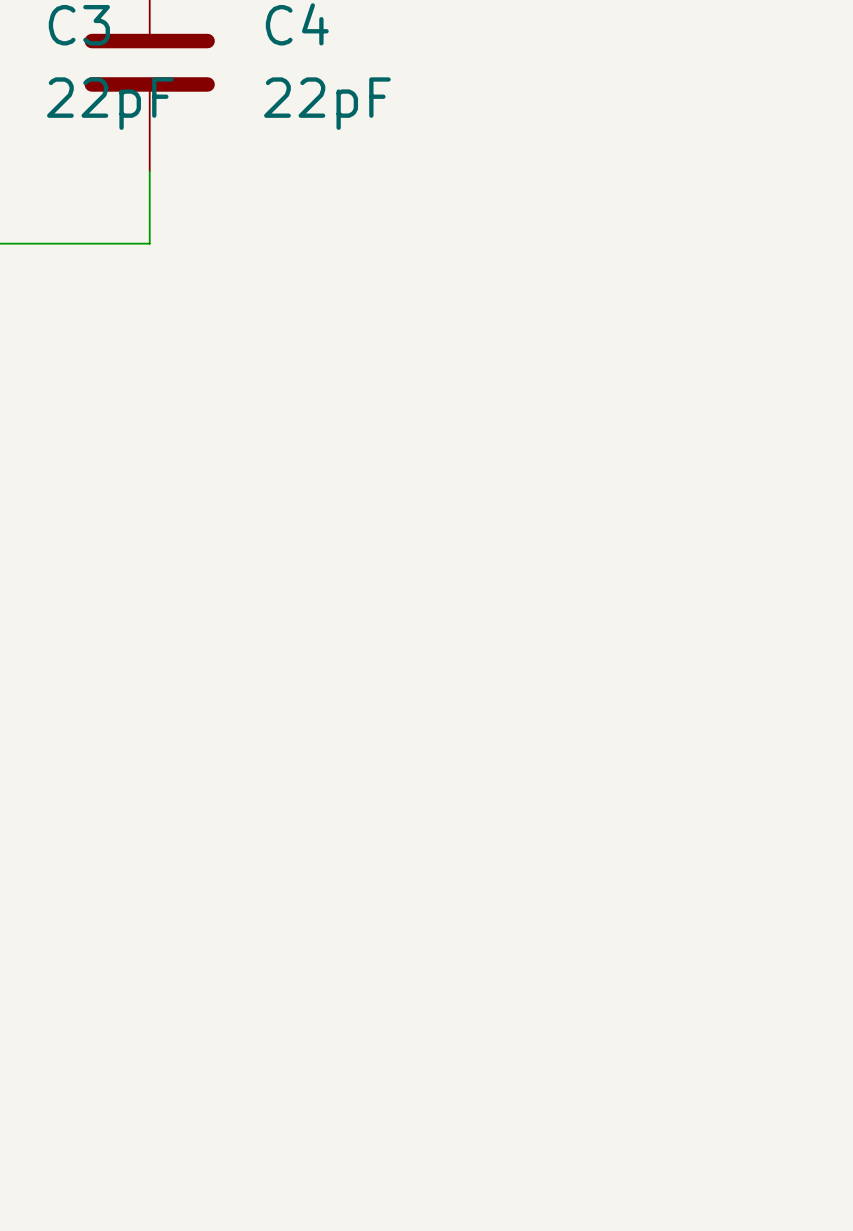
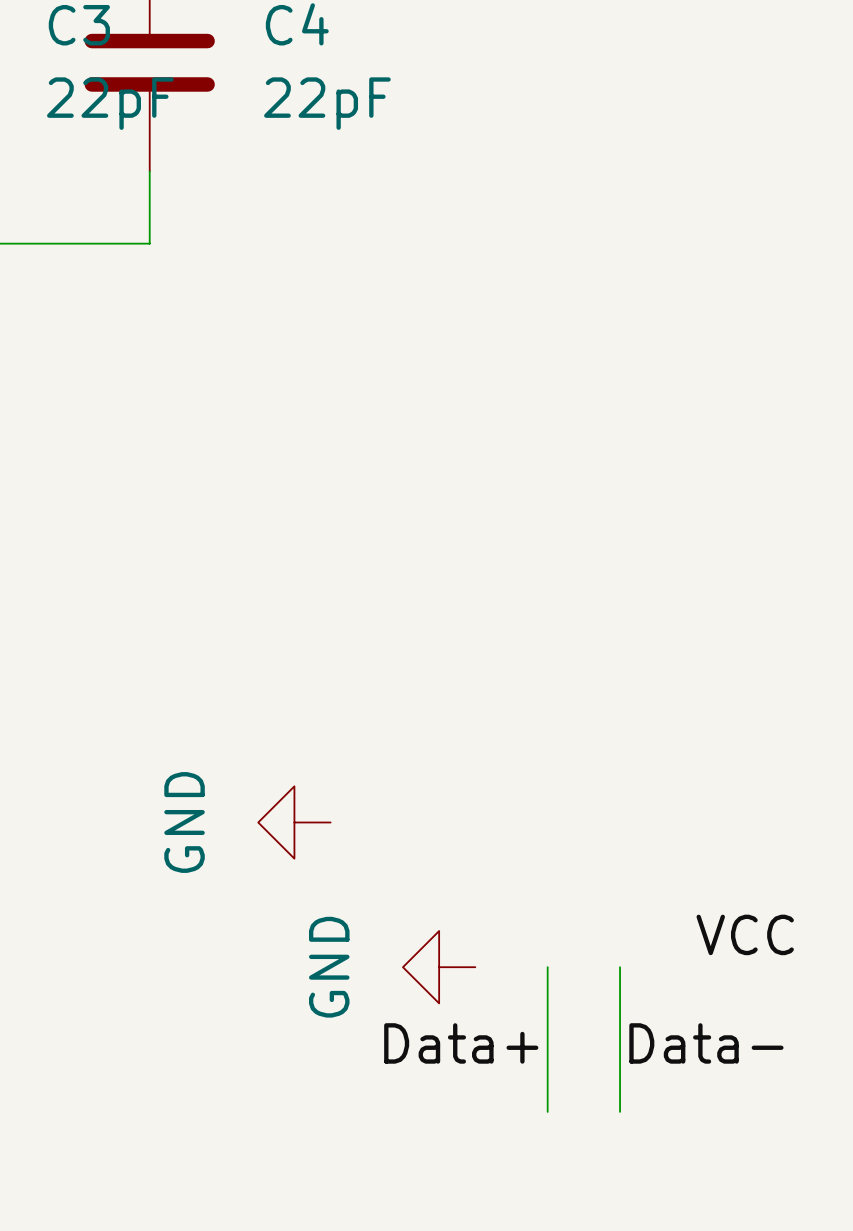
power symbol: none -> GND (294, 822)
label: none -> VCC (745, 934)
power symbol: none -> GND (439, 967)
wire: none -> (547, 967) (547, 1111)
wire: none -> (620, 967) (620, 1111)
label: none -> Data+ (461, 1043)
label: none -> Data- (706, 1043)

